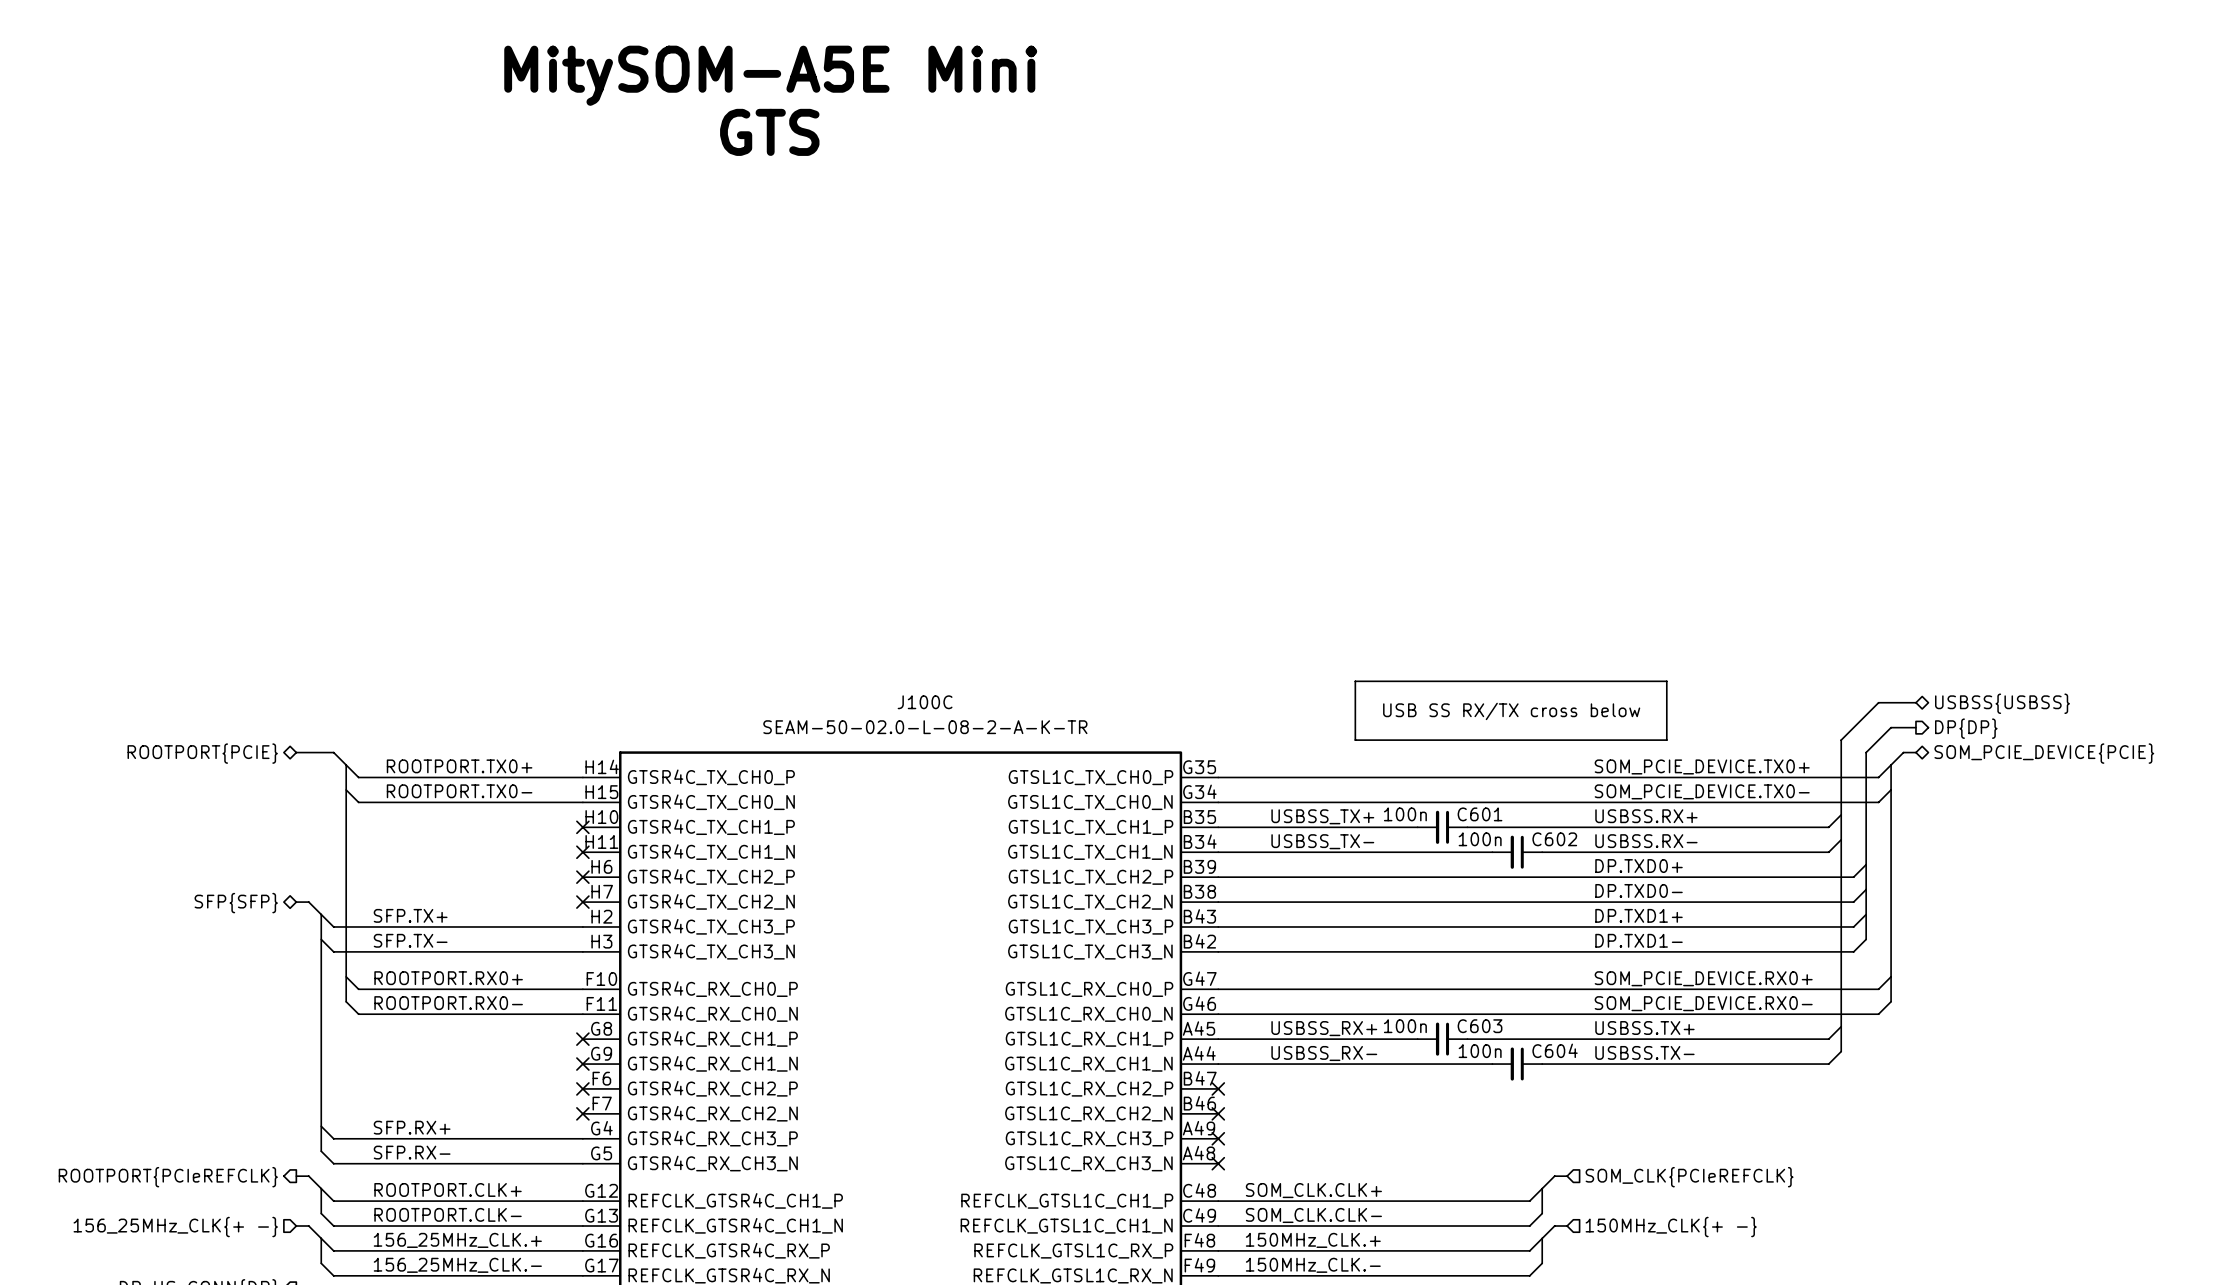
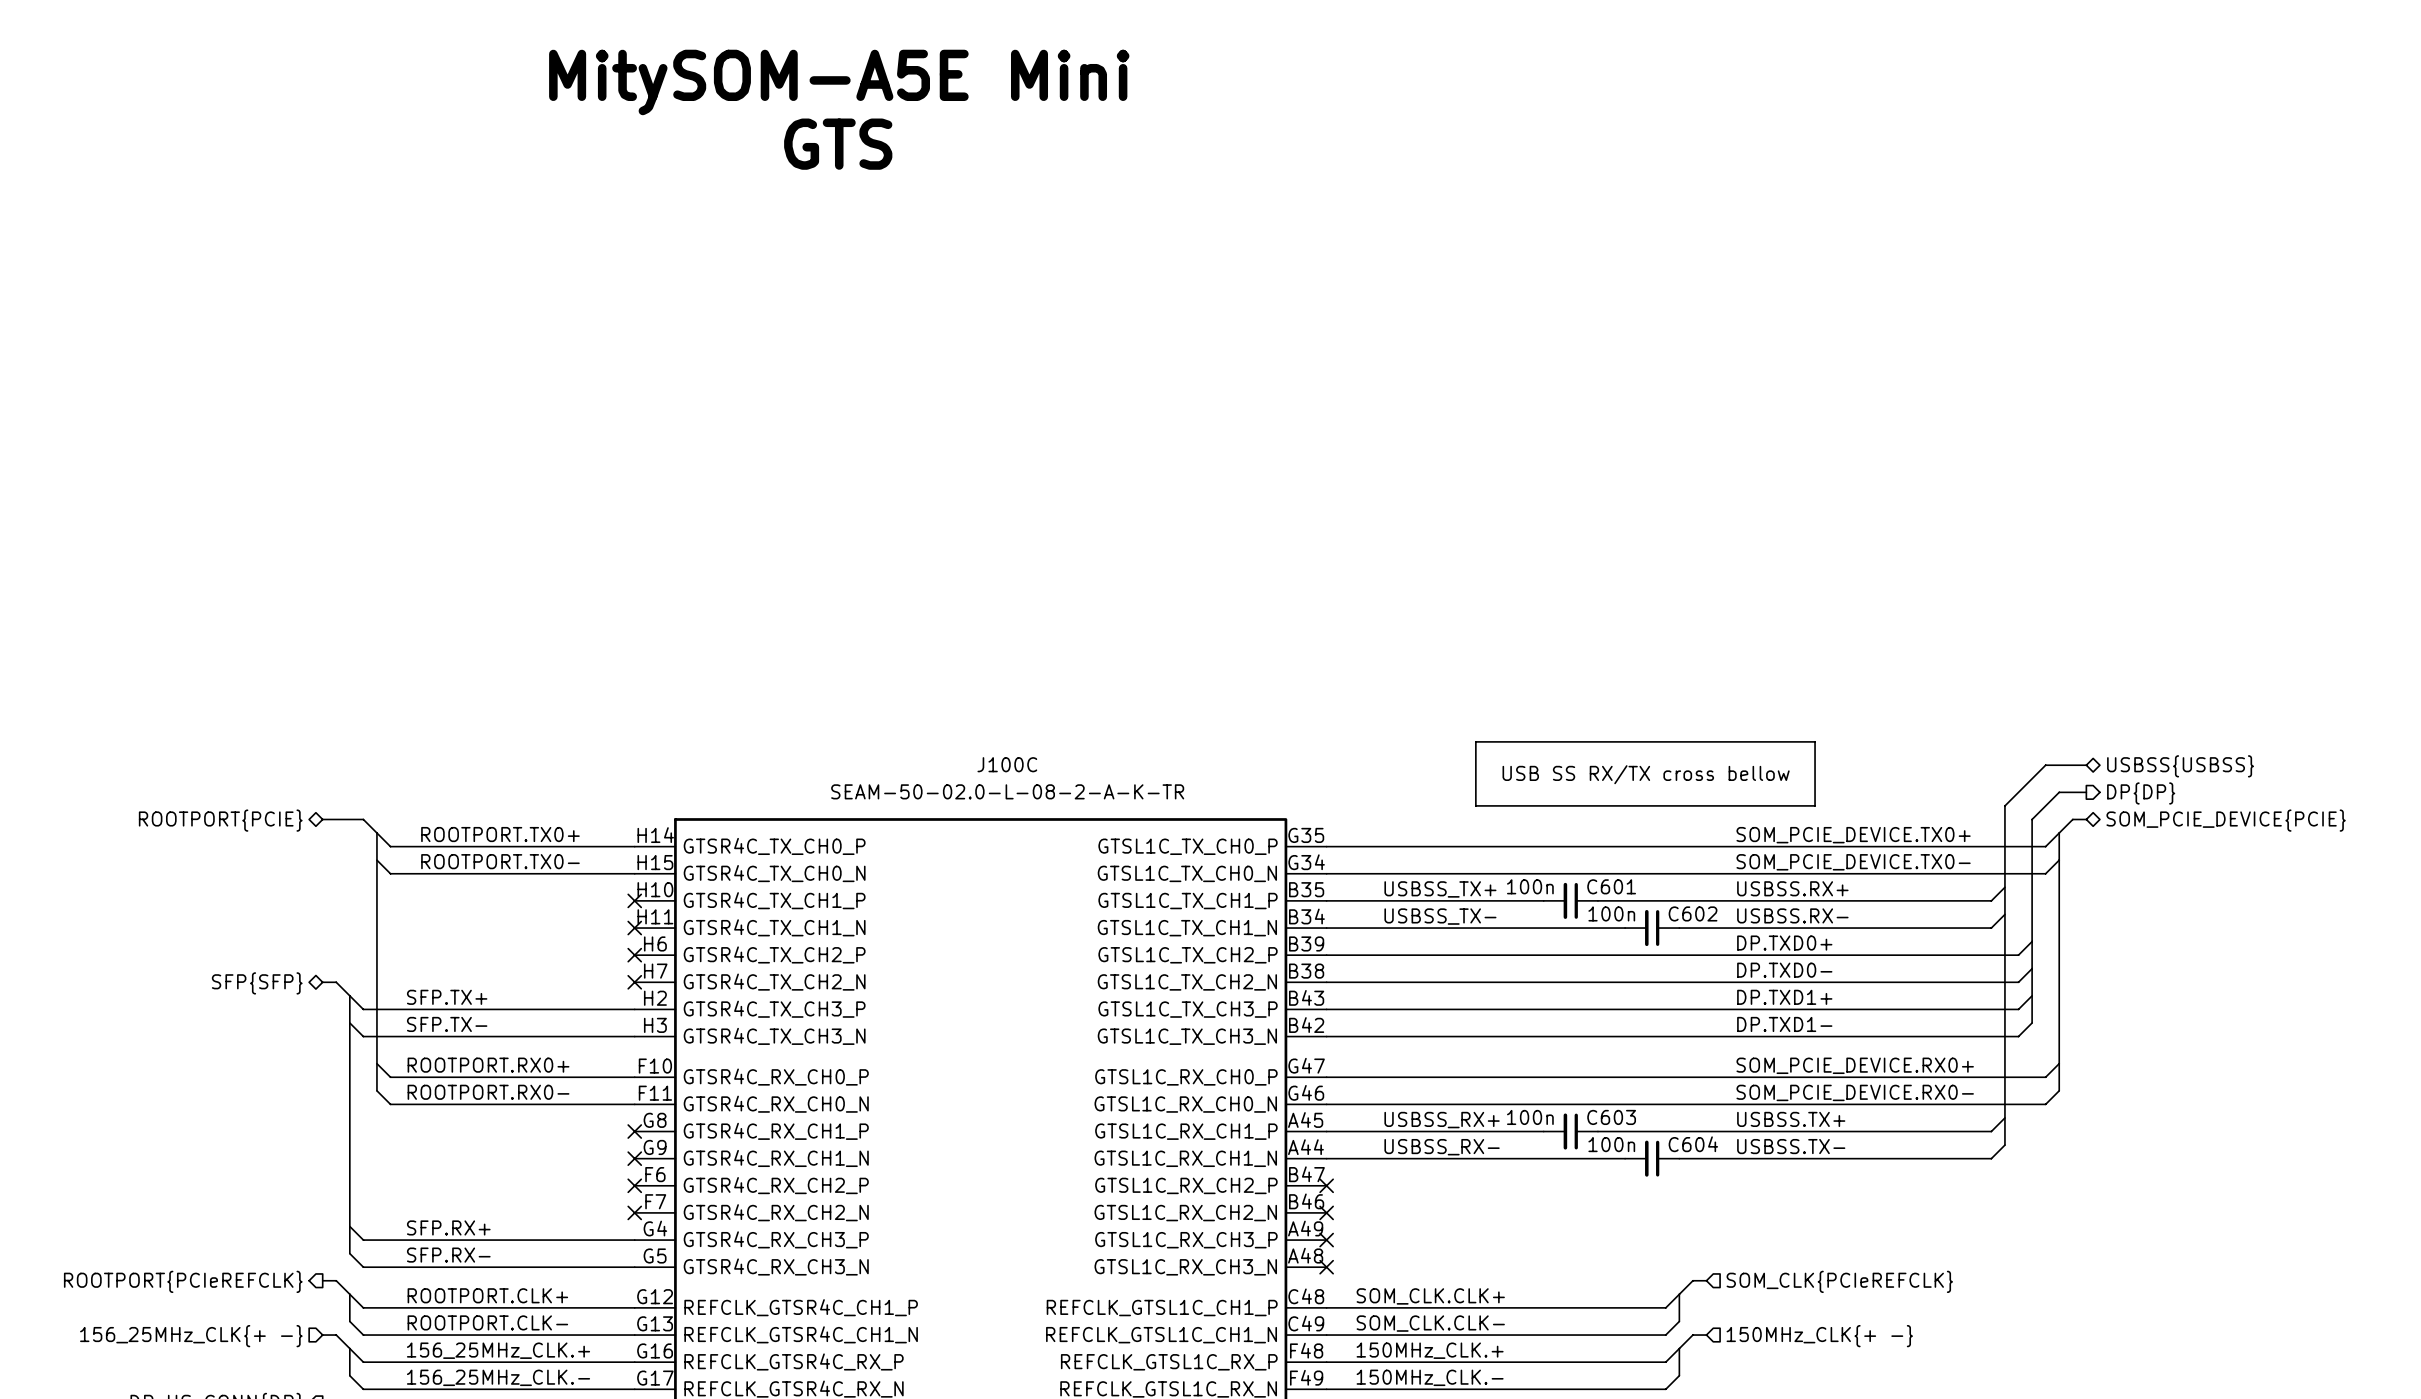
text: USB SS RX/TX cross below (1511, 711) -> USB SS RX/TX cross bellow (1646, 774)

